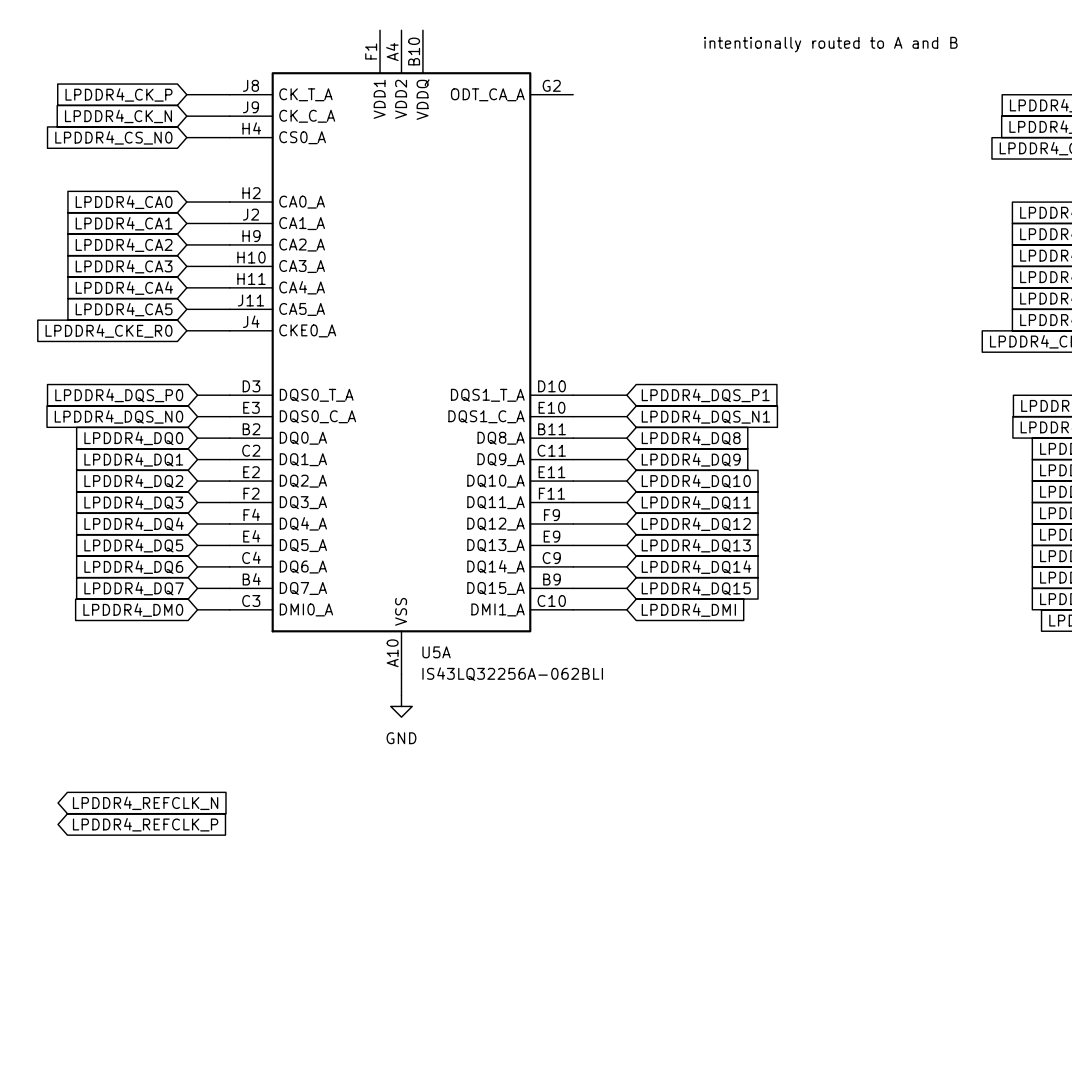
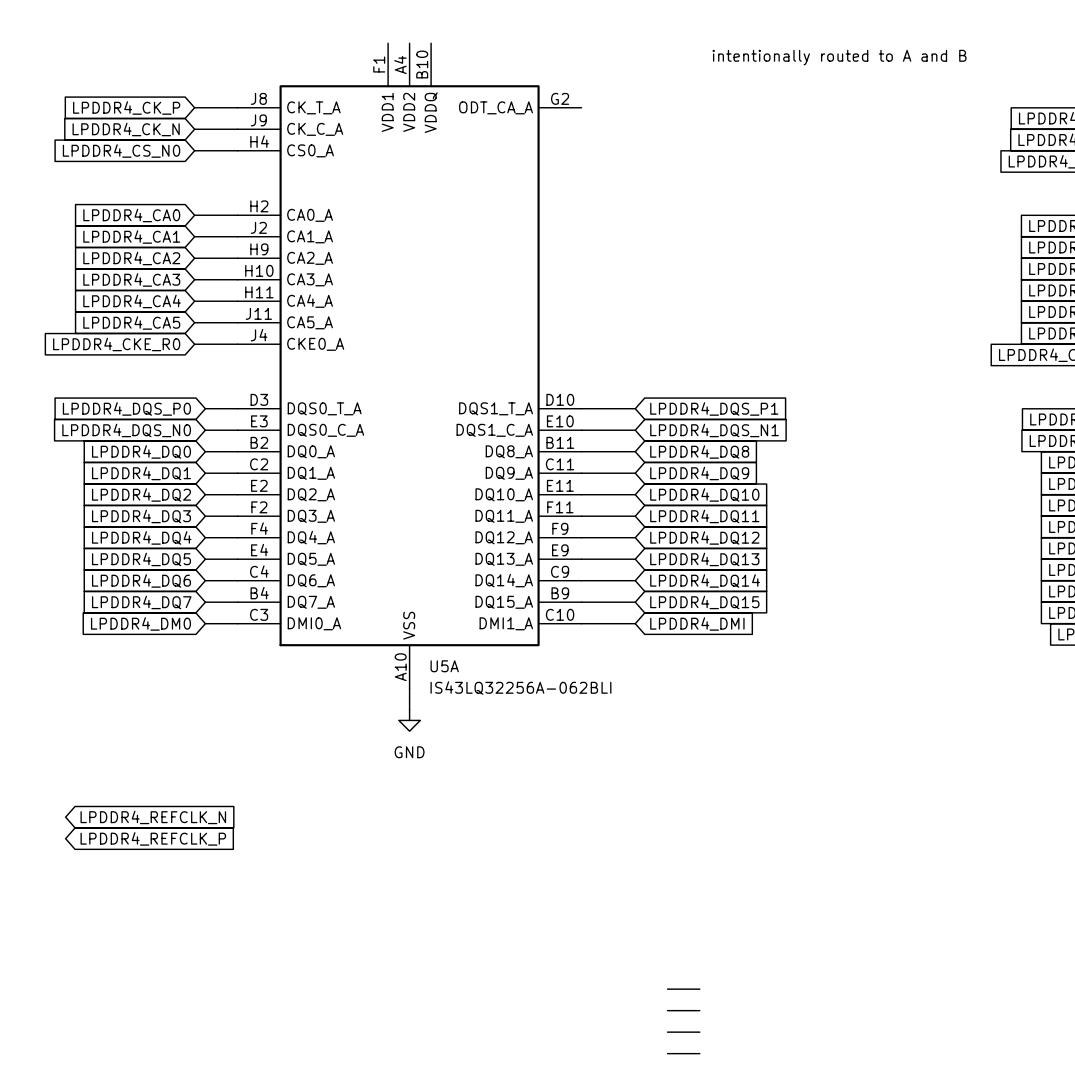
wire: none -> (667, 989) (699, 989)
wire: none -> (667, 1010) (699, 1010)
wire: none -> (667, 1032) (699, 1032)
wire: none -> (667, 1053) (699, 1053)

